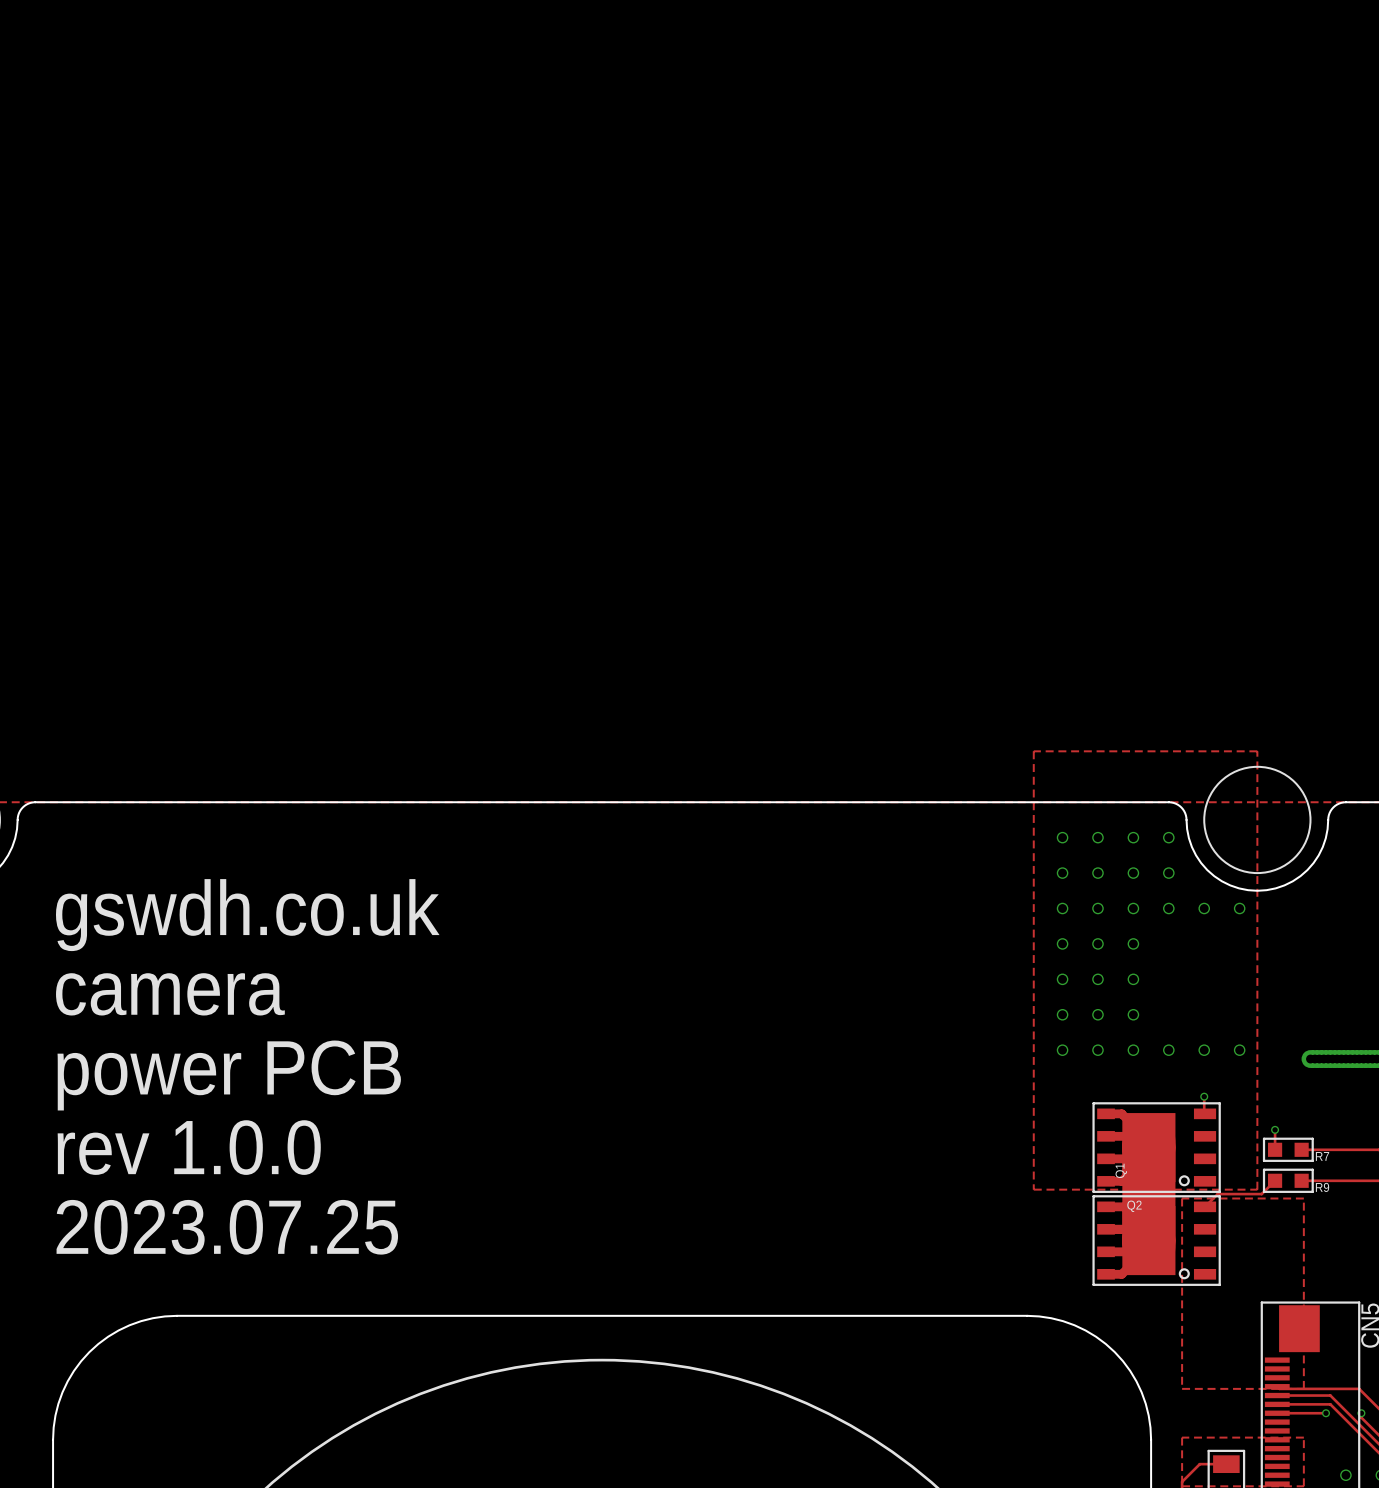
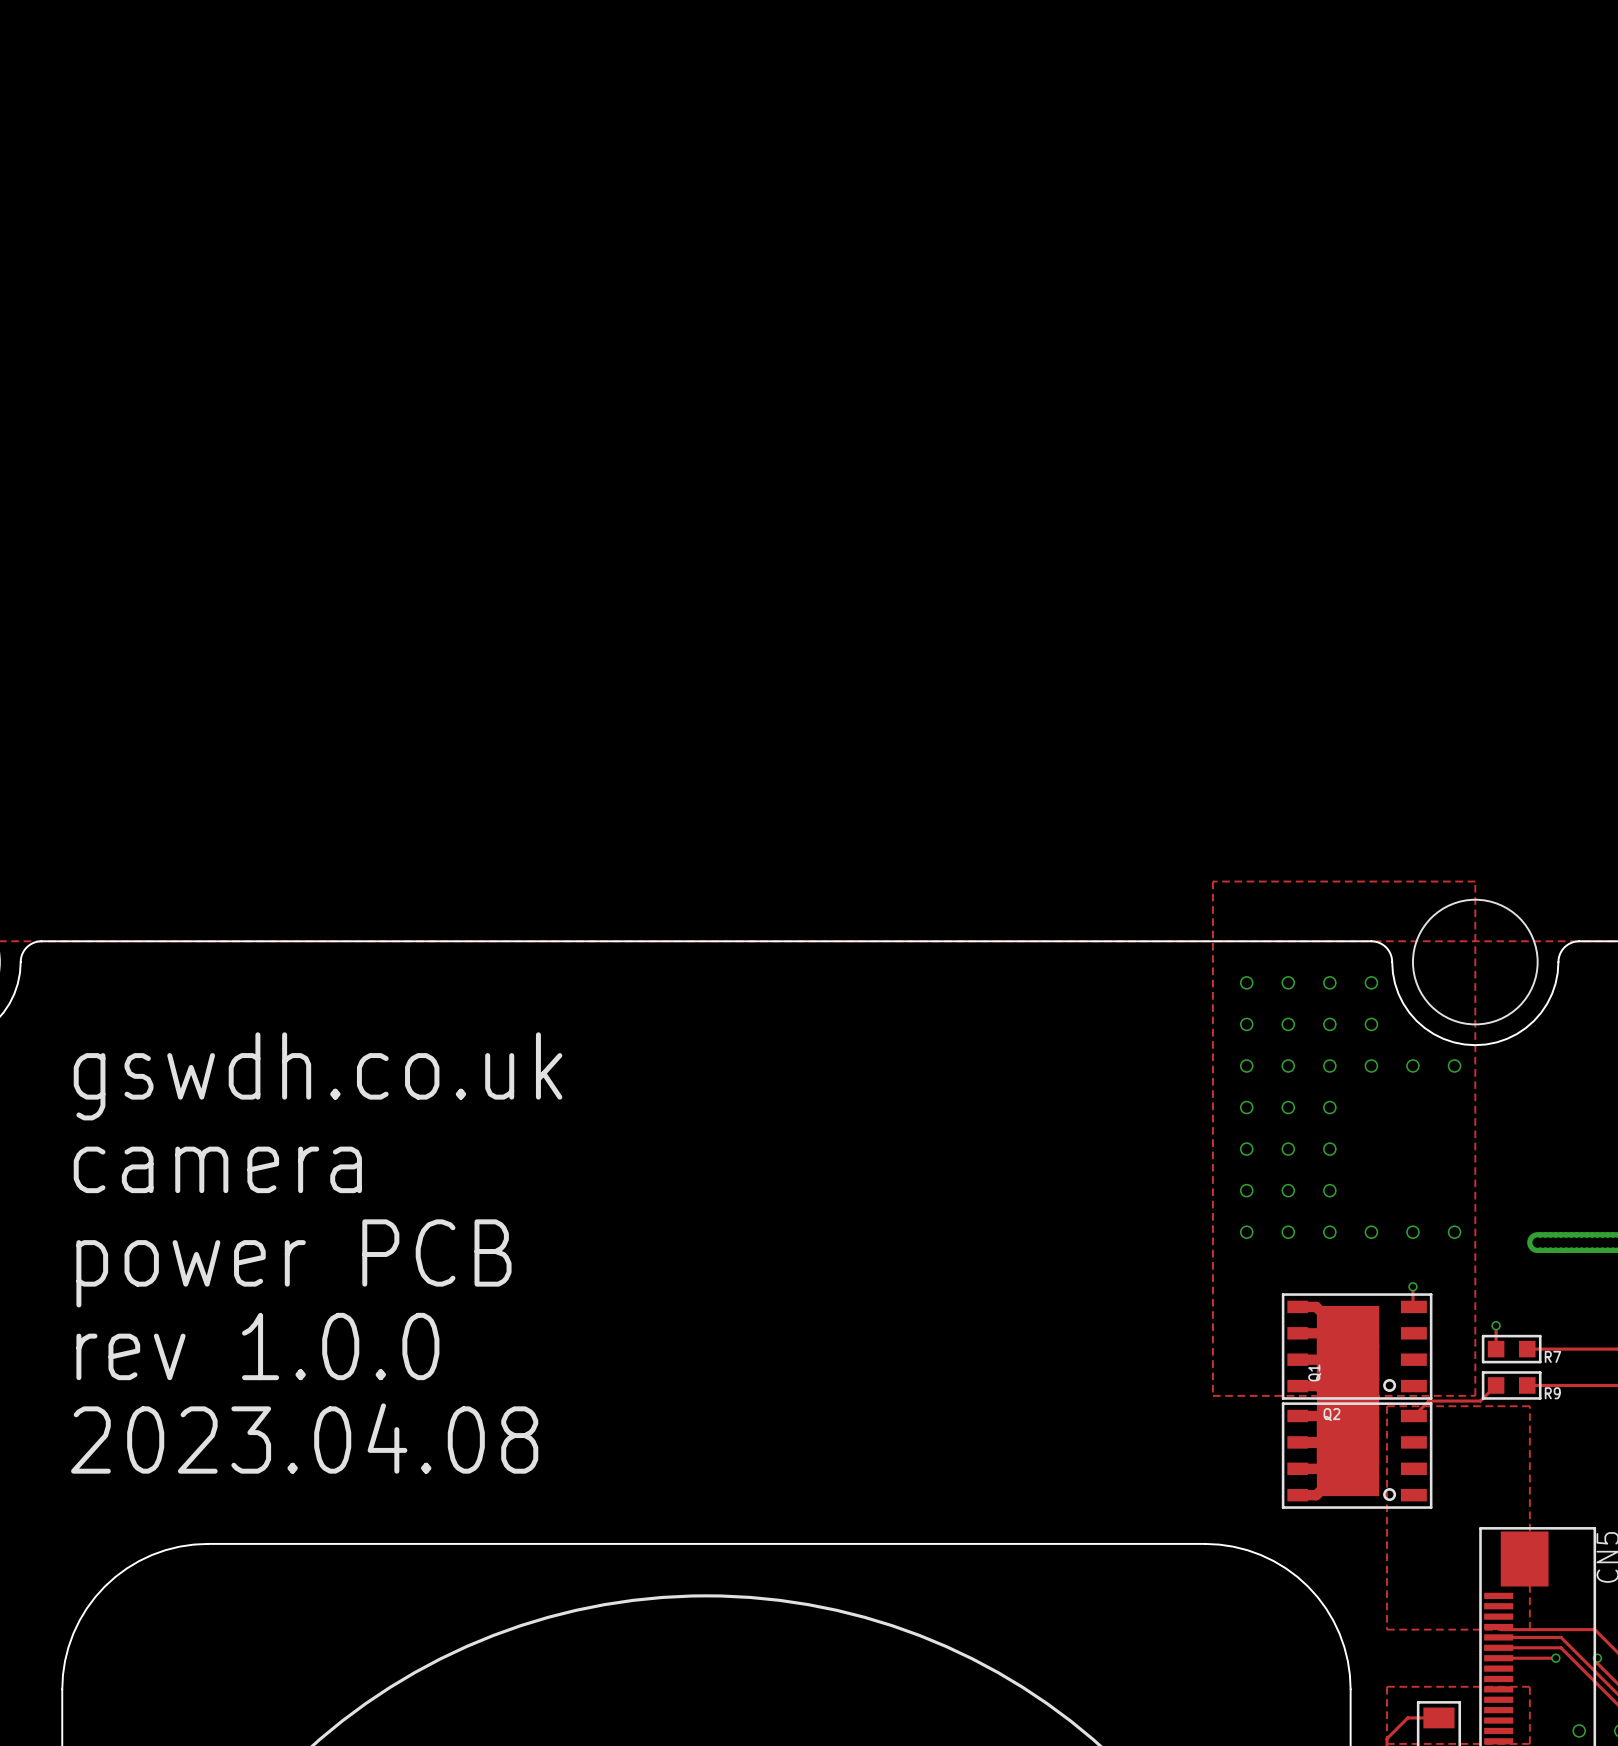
text: 2023.07.25 (227, 1227) -> 2023.04.08 (304, 1438)

